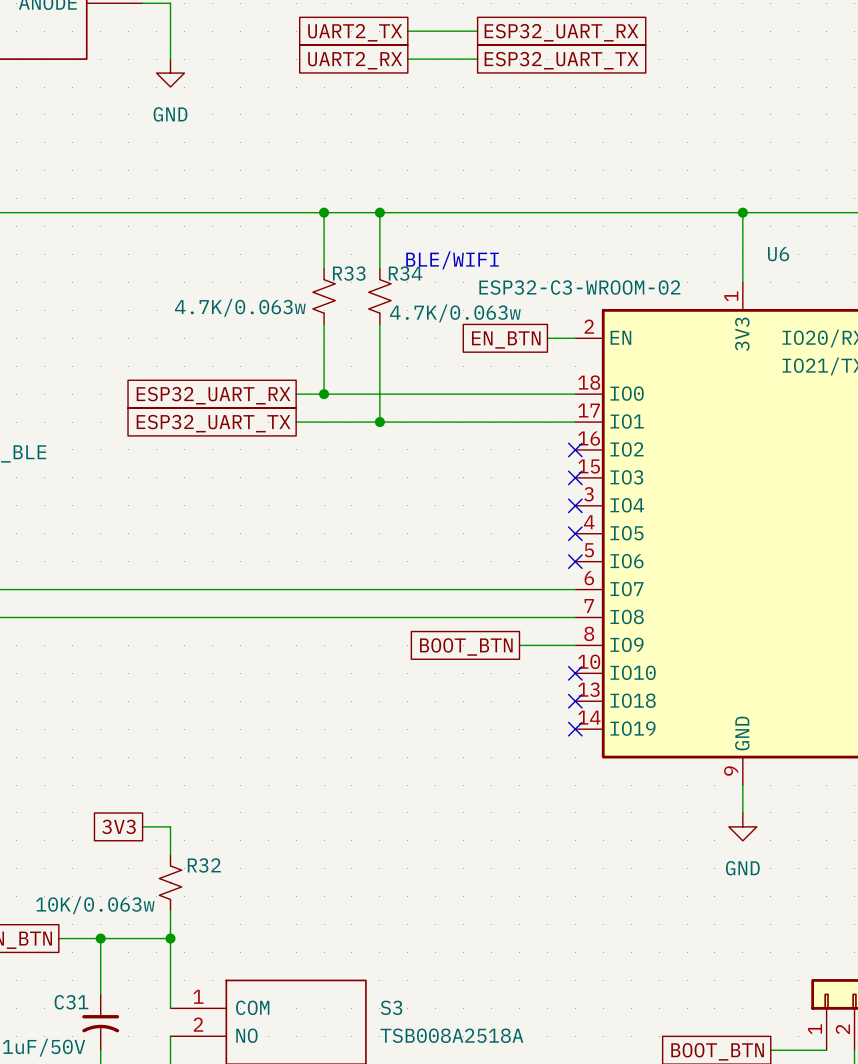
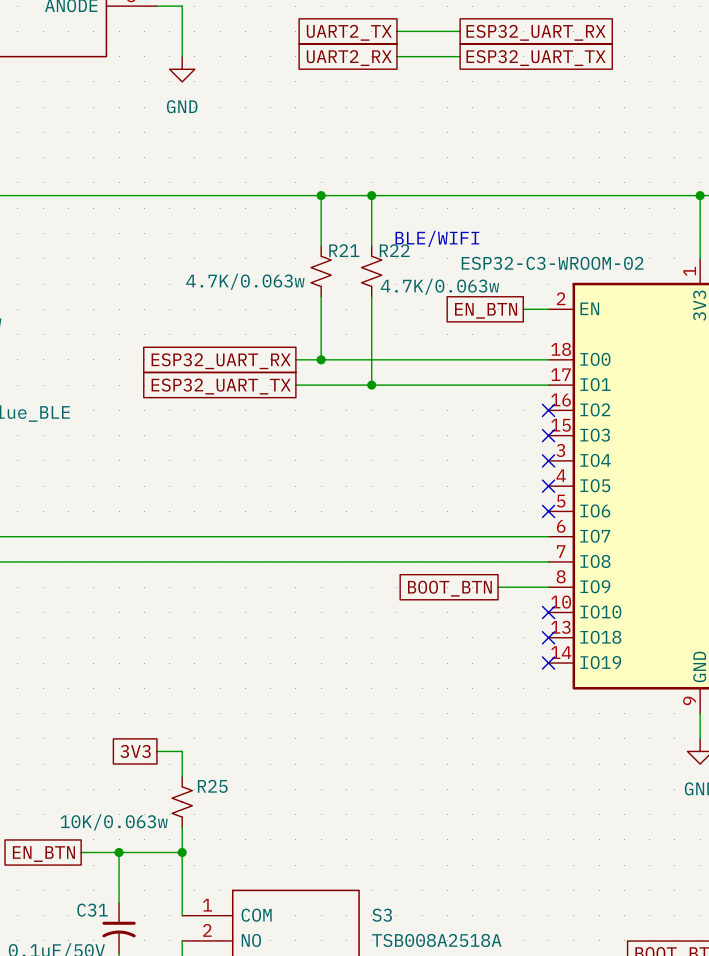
R33 name: R33 (349, 273) -> R21 (344, 250)
R34 name: R34 (405, 273) -> R22 (394, 250)
R32 name: R32 (204, 865) -> R25 (212, 786)

